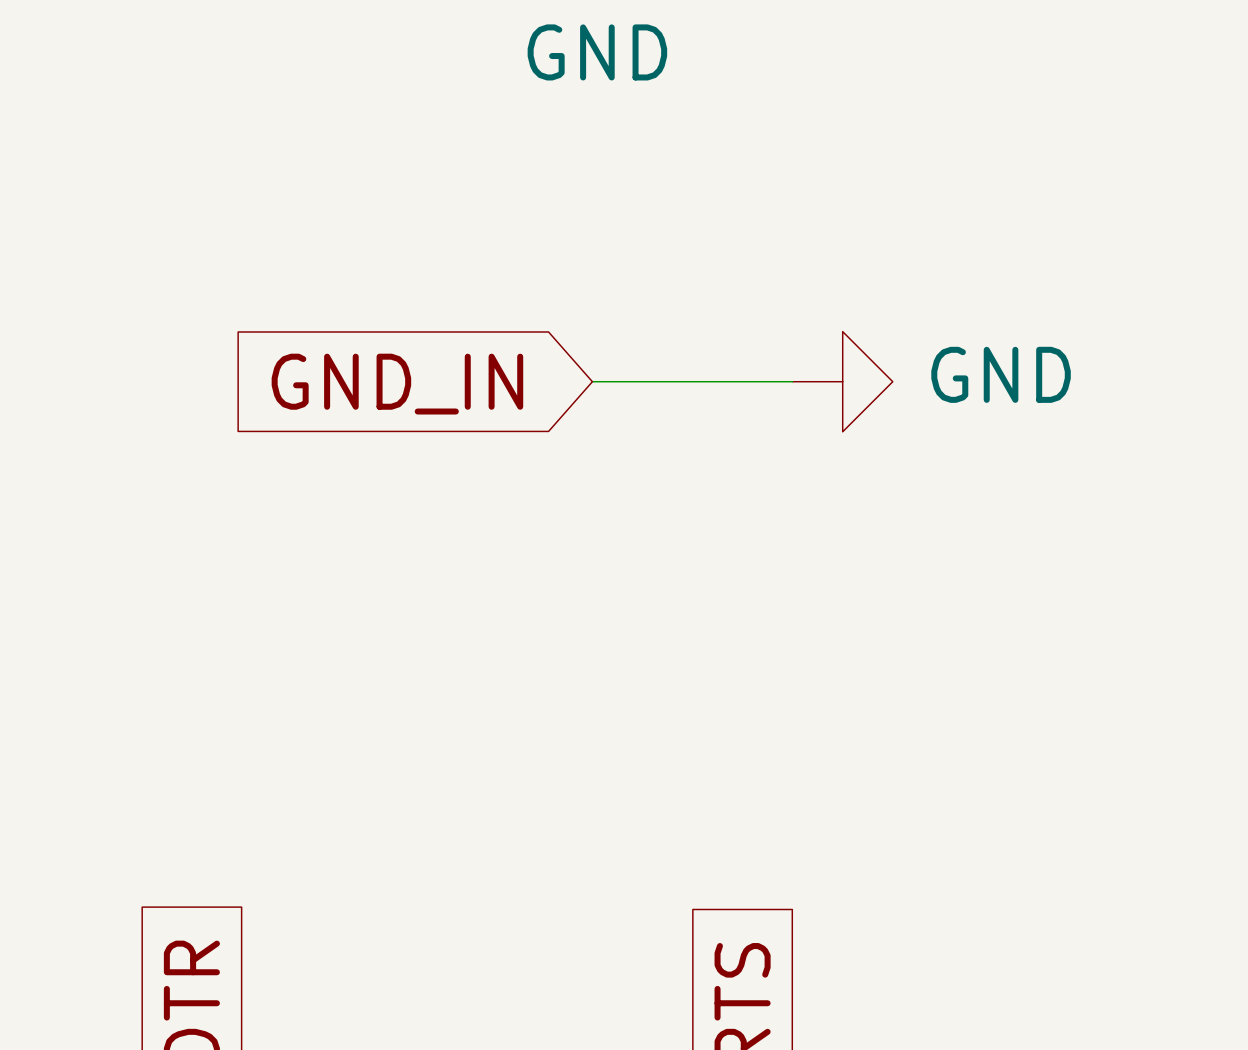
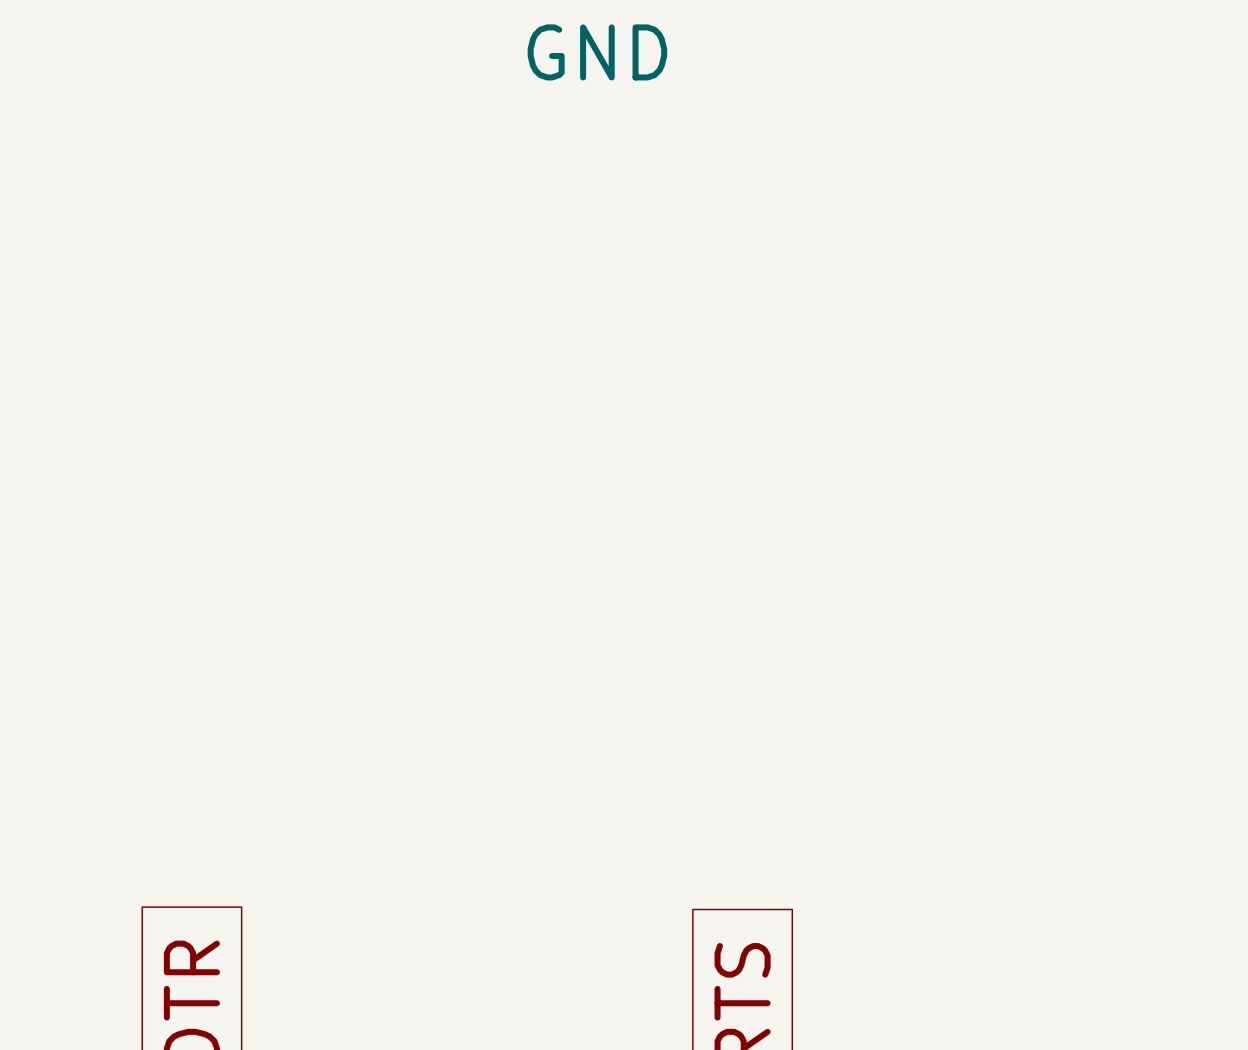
wire: (592, 381) (792, 381) -> none
power symbol: GND (842, 381) -> none
global label: GND_IN (397, 384) -> none

